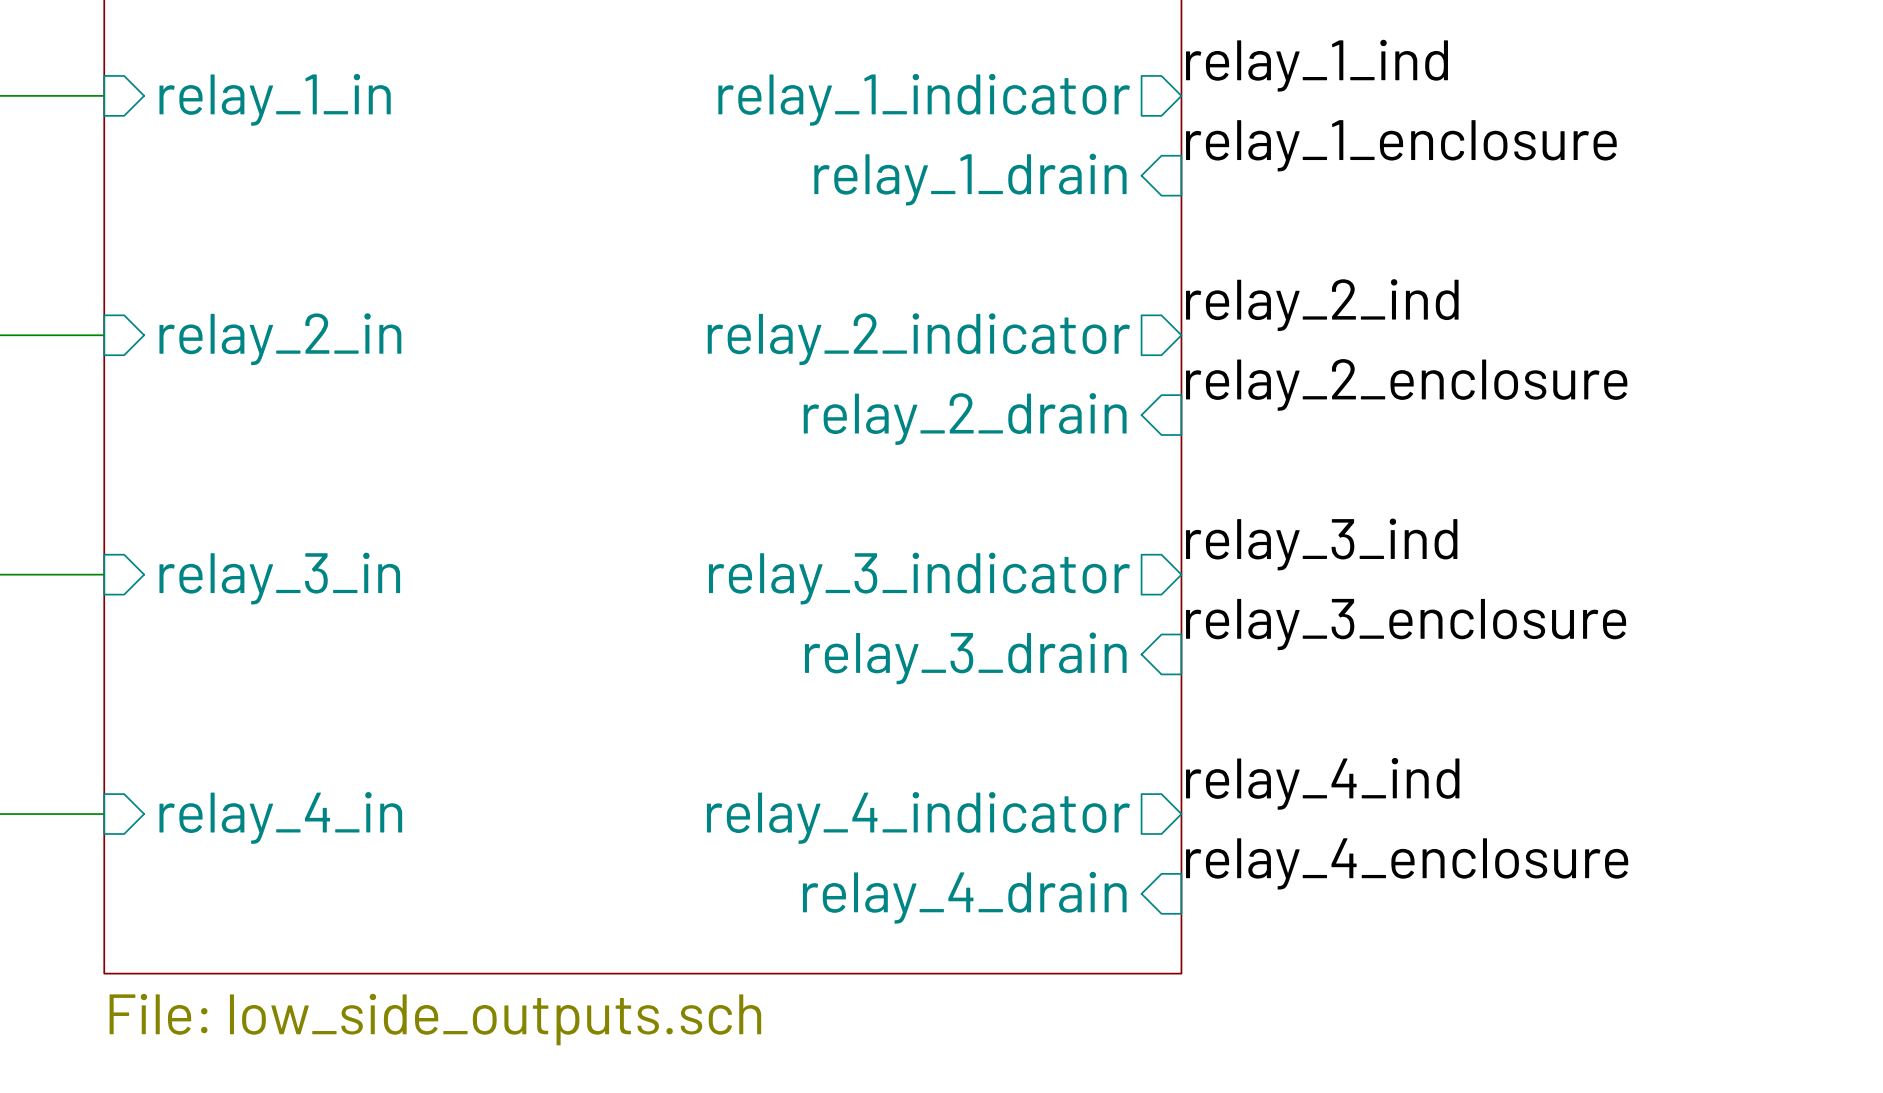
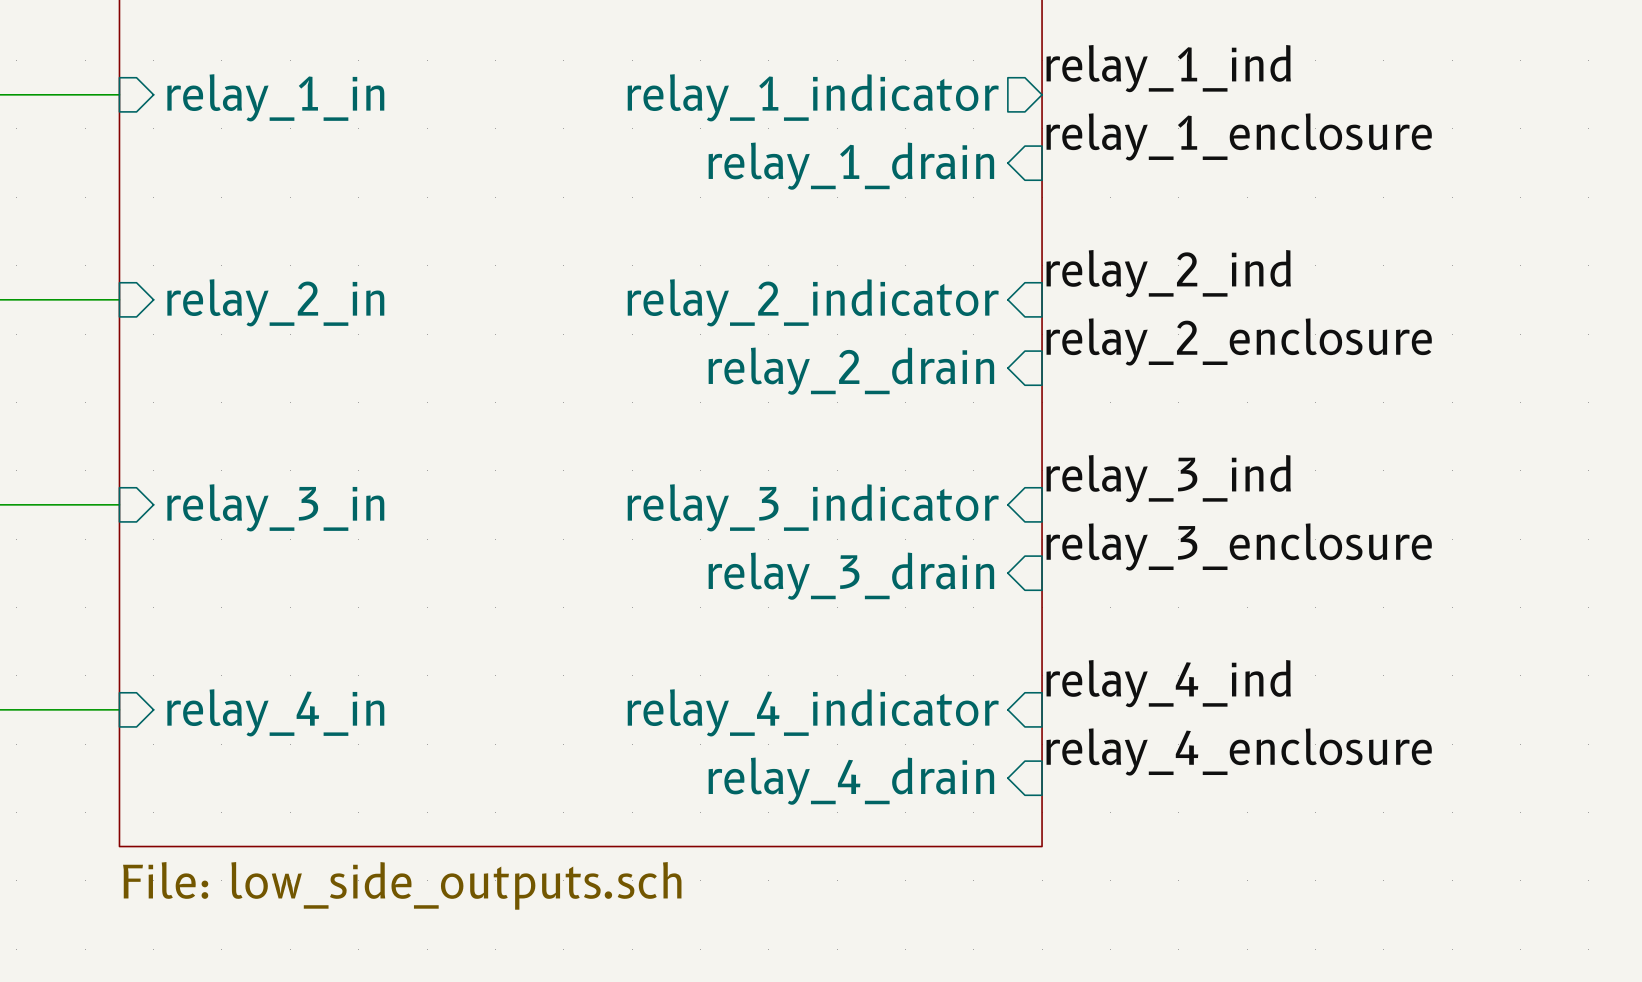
sheet pin shape: output (918, 339) -> input (813, 302)
sheet pin shape: output (919, 578) -> input (813, 507)
sheet pin shape: output (918, 817) -> input (813, 712)

